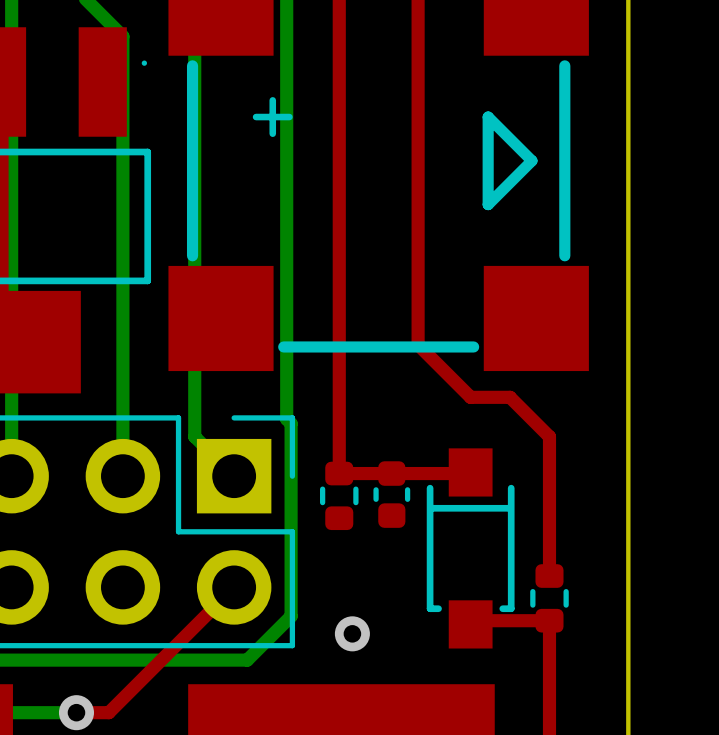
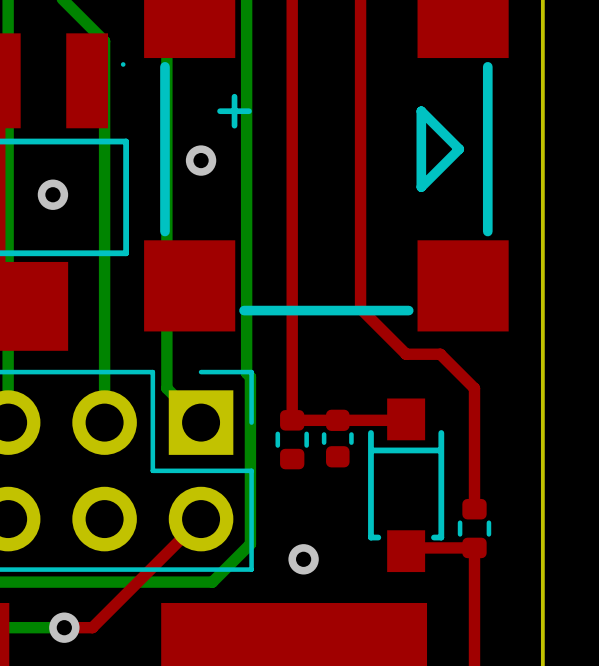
via: none -> (201, 160)
via: none -> (52, 194)

